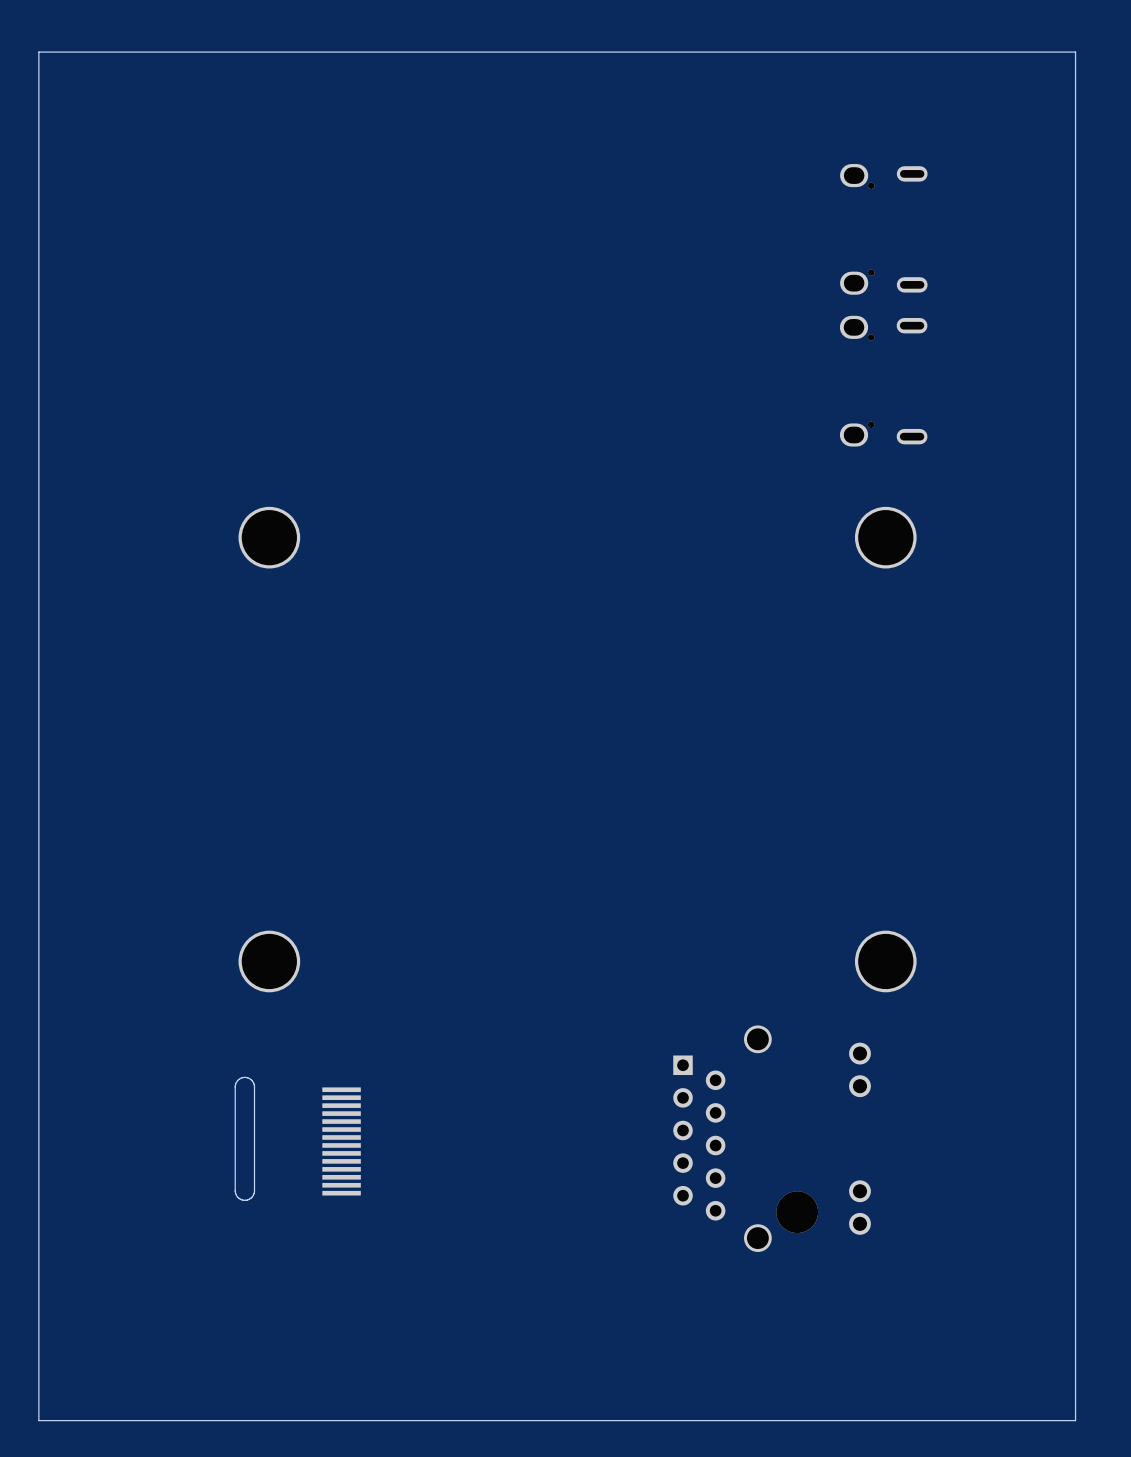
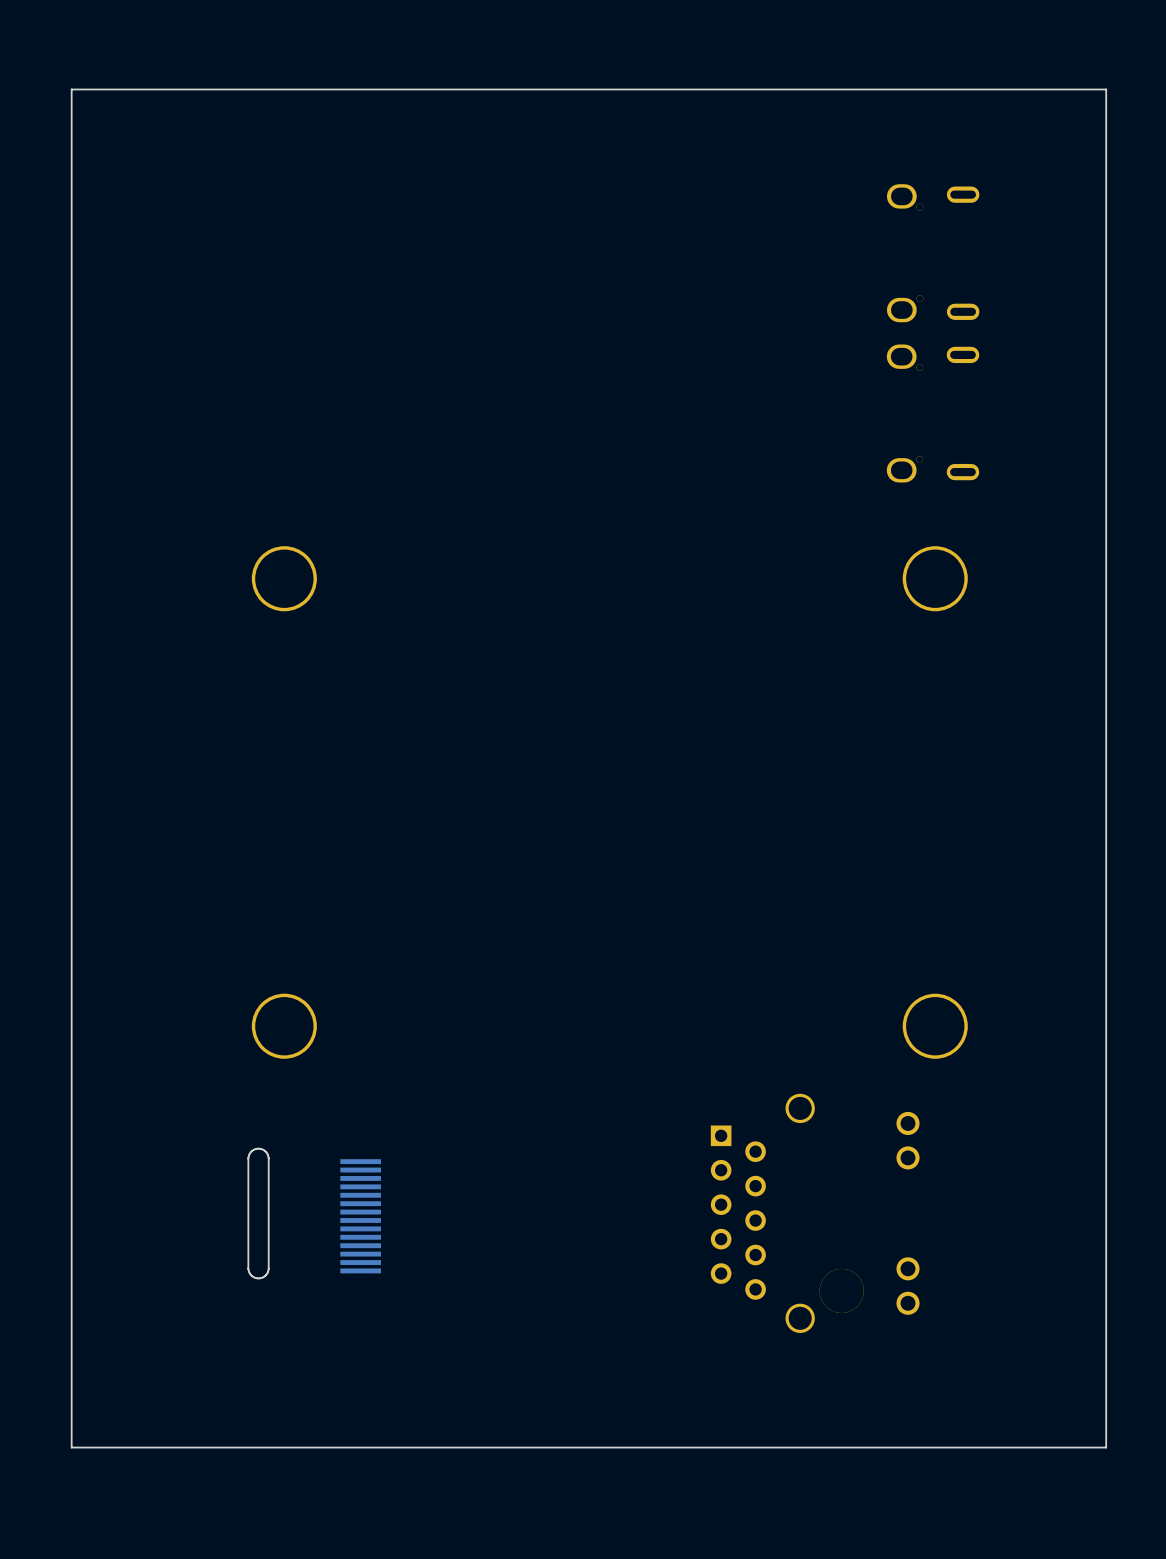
board edge: (1075, 52) (38, 52) (38, 1420) (1075, 1420) (1075, 52) -> (1106, 89) (1106, 1447) (71, 1447) (71, 89) (1106, 89)

